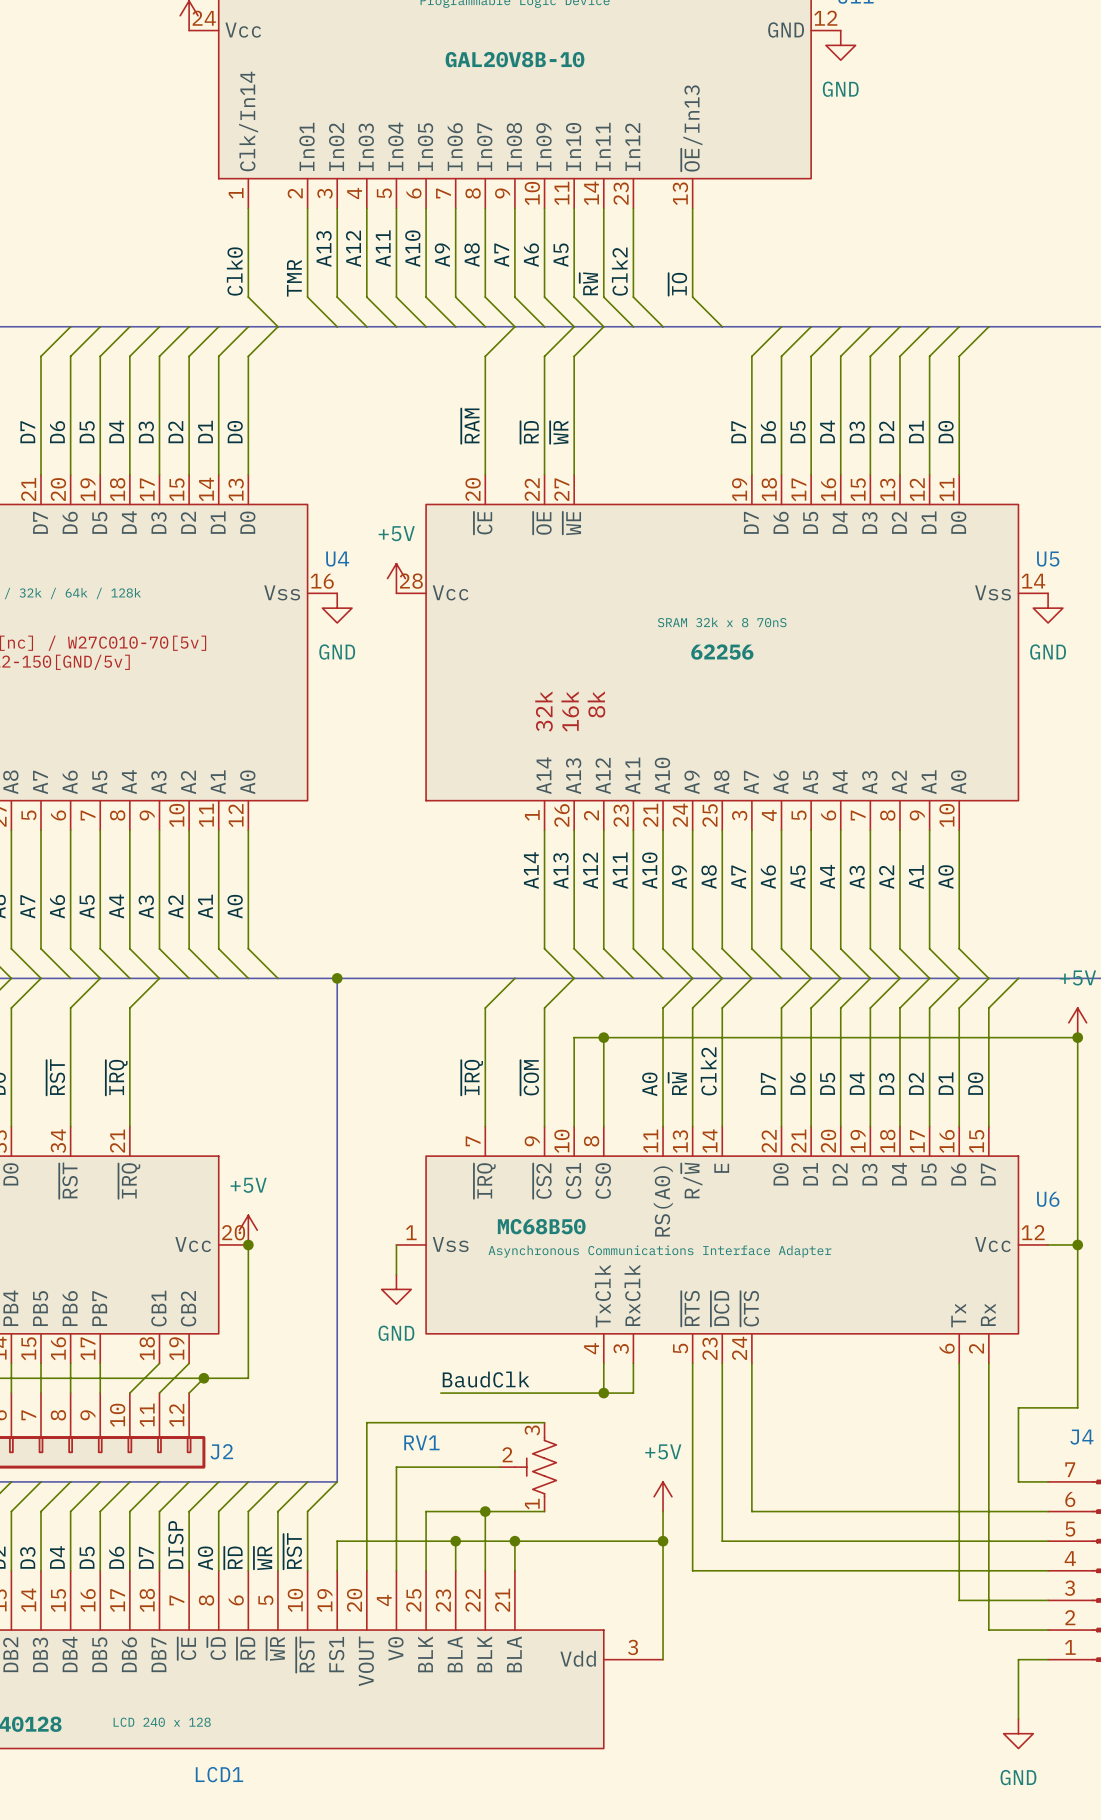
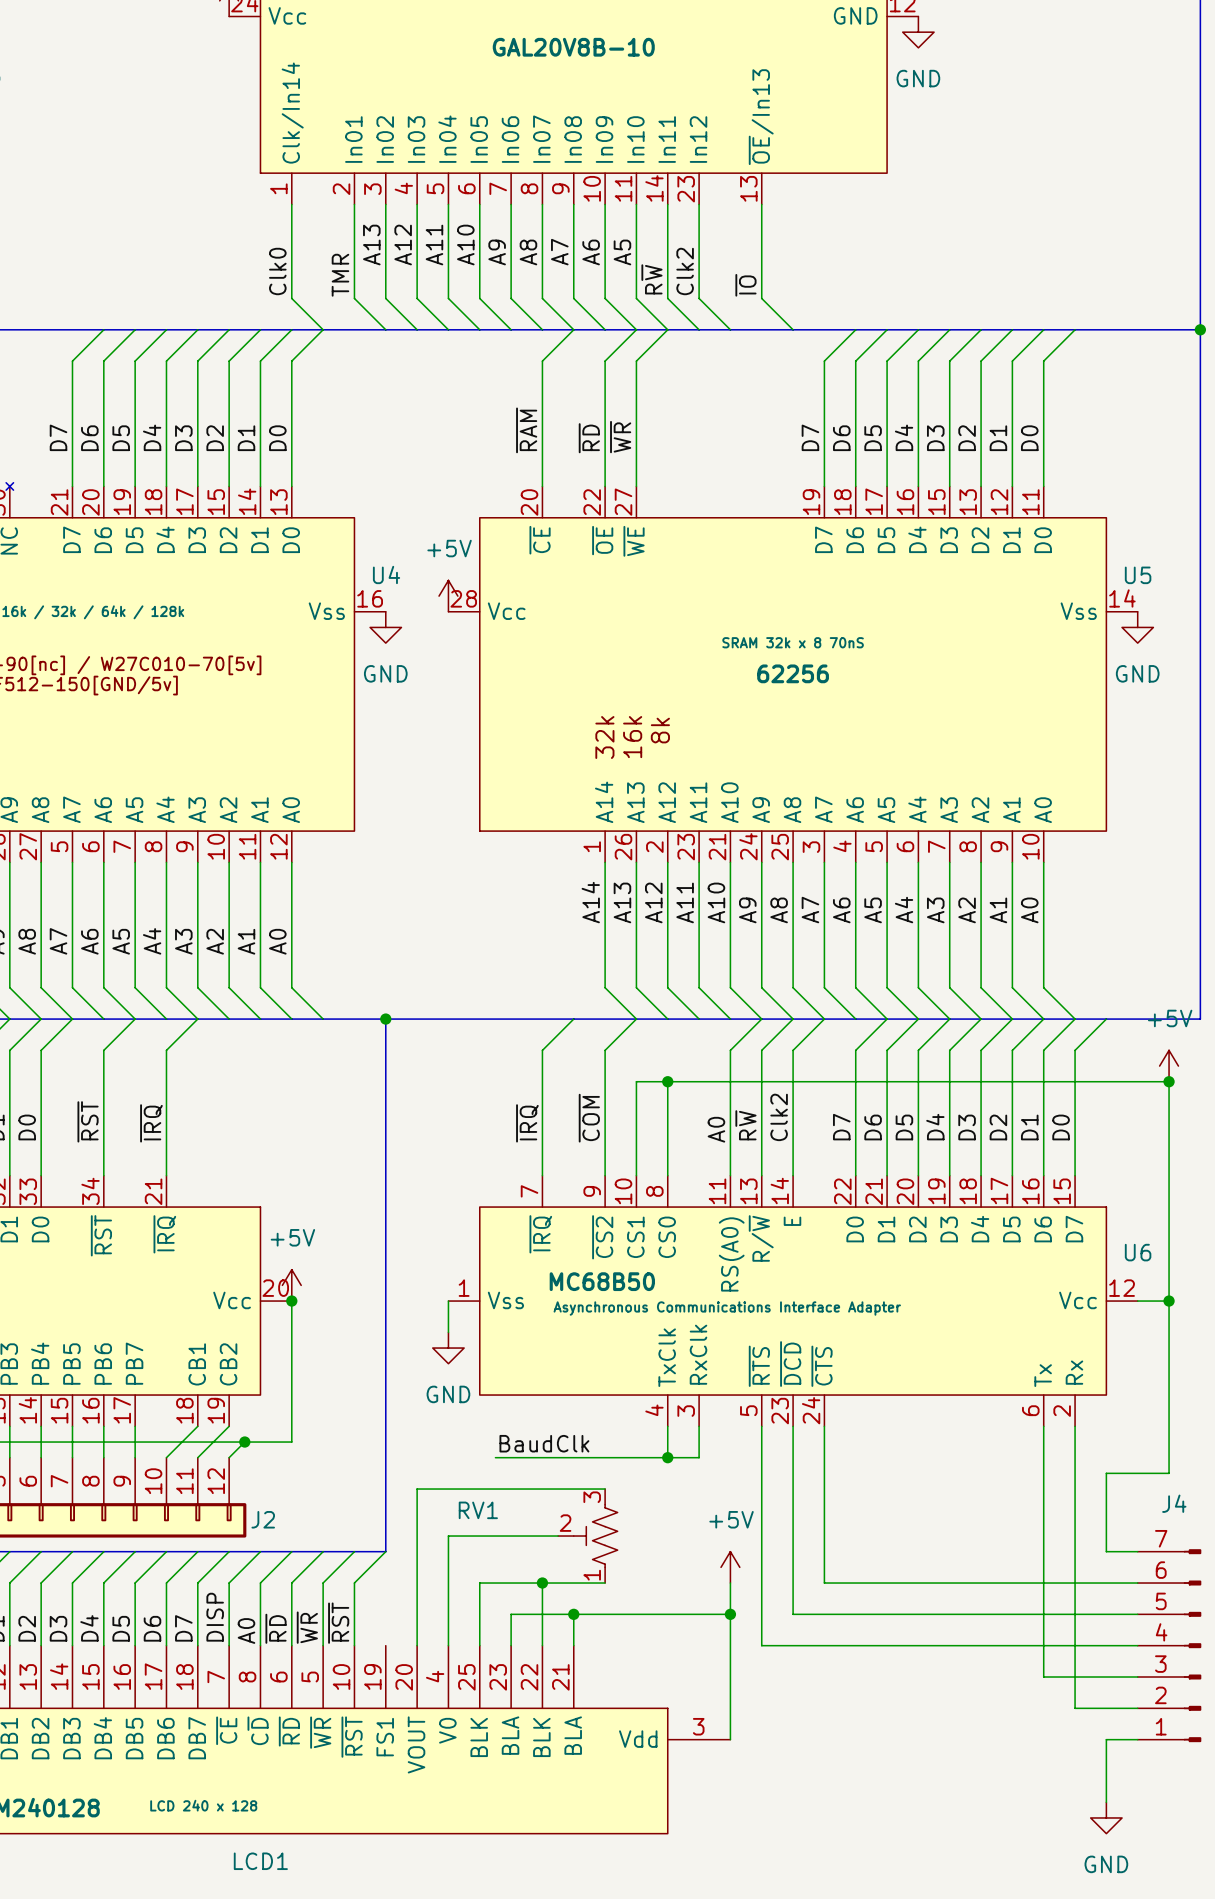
wire: (455, 1541) (337, 1541) (337, 1570) -> none
junction: (455, 1541) -> none

